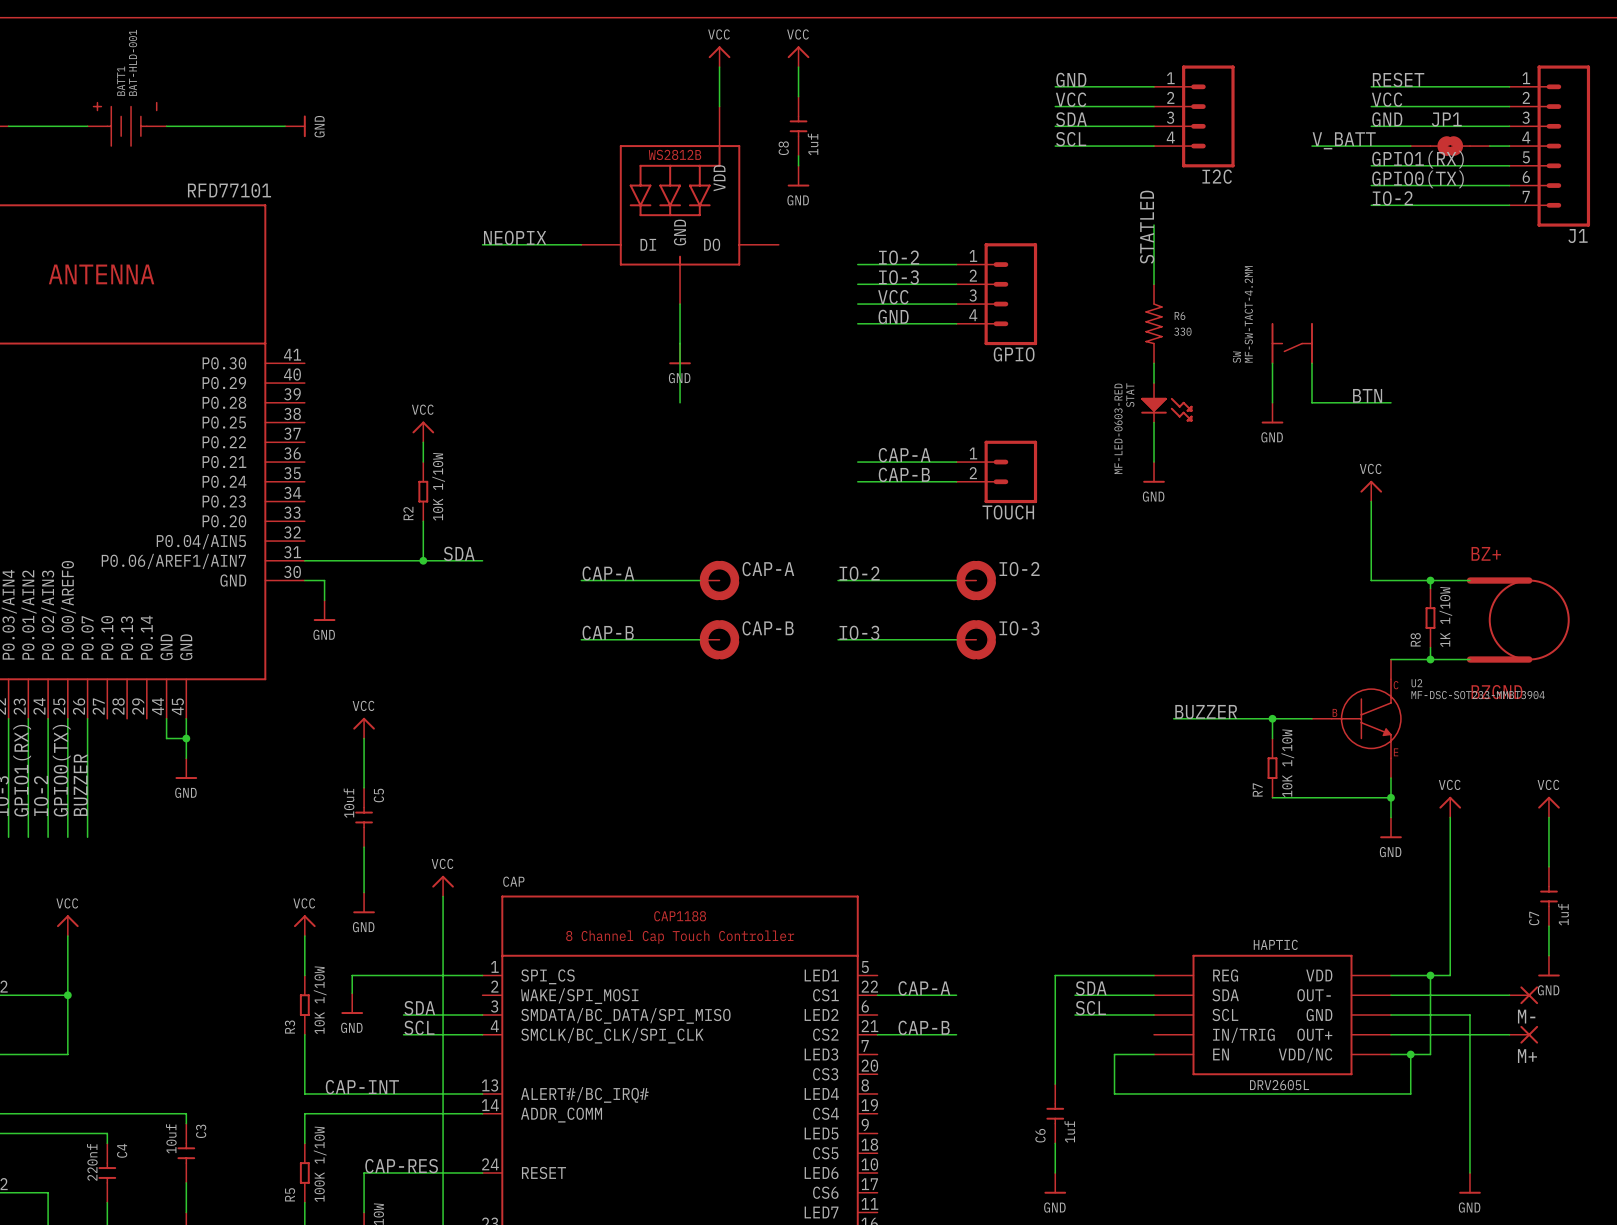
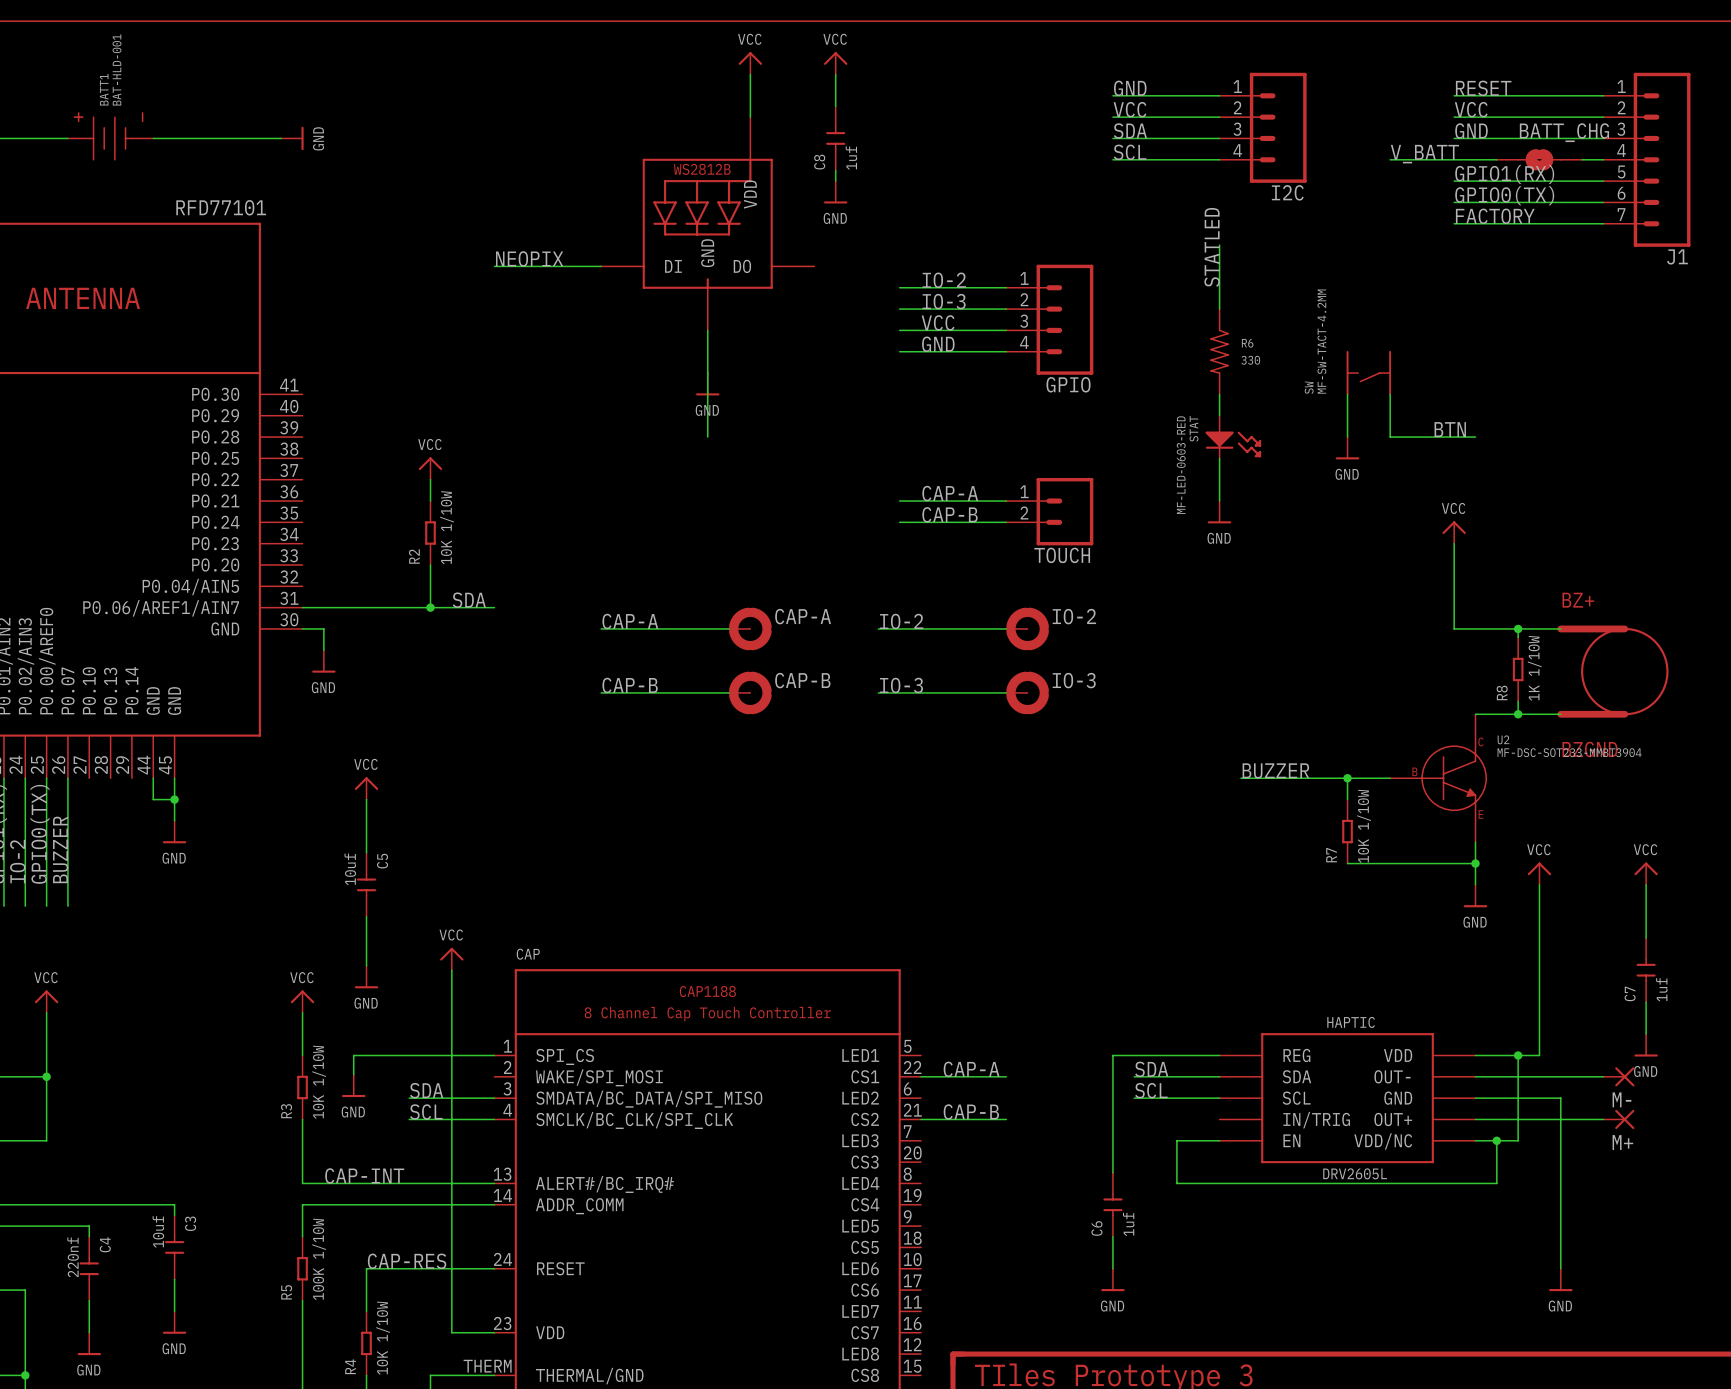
JP1 name: JP1 (1446, 119) -> BATT_CHG (1564, 132)
label: IO-2 (1392, 198) -> FACTORY (1495, 216)

